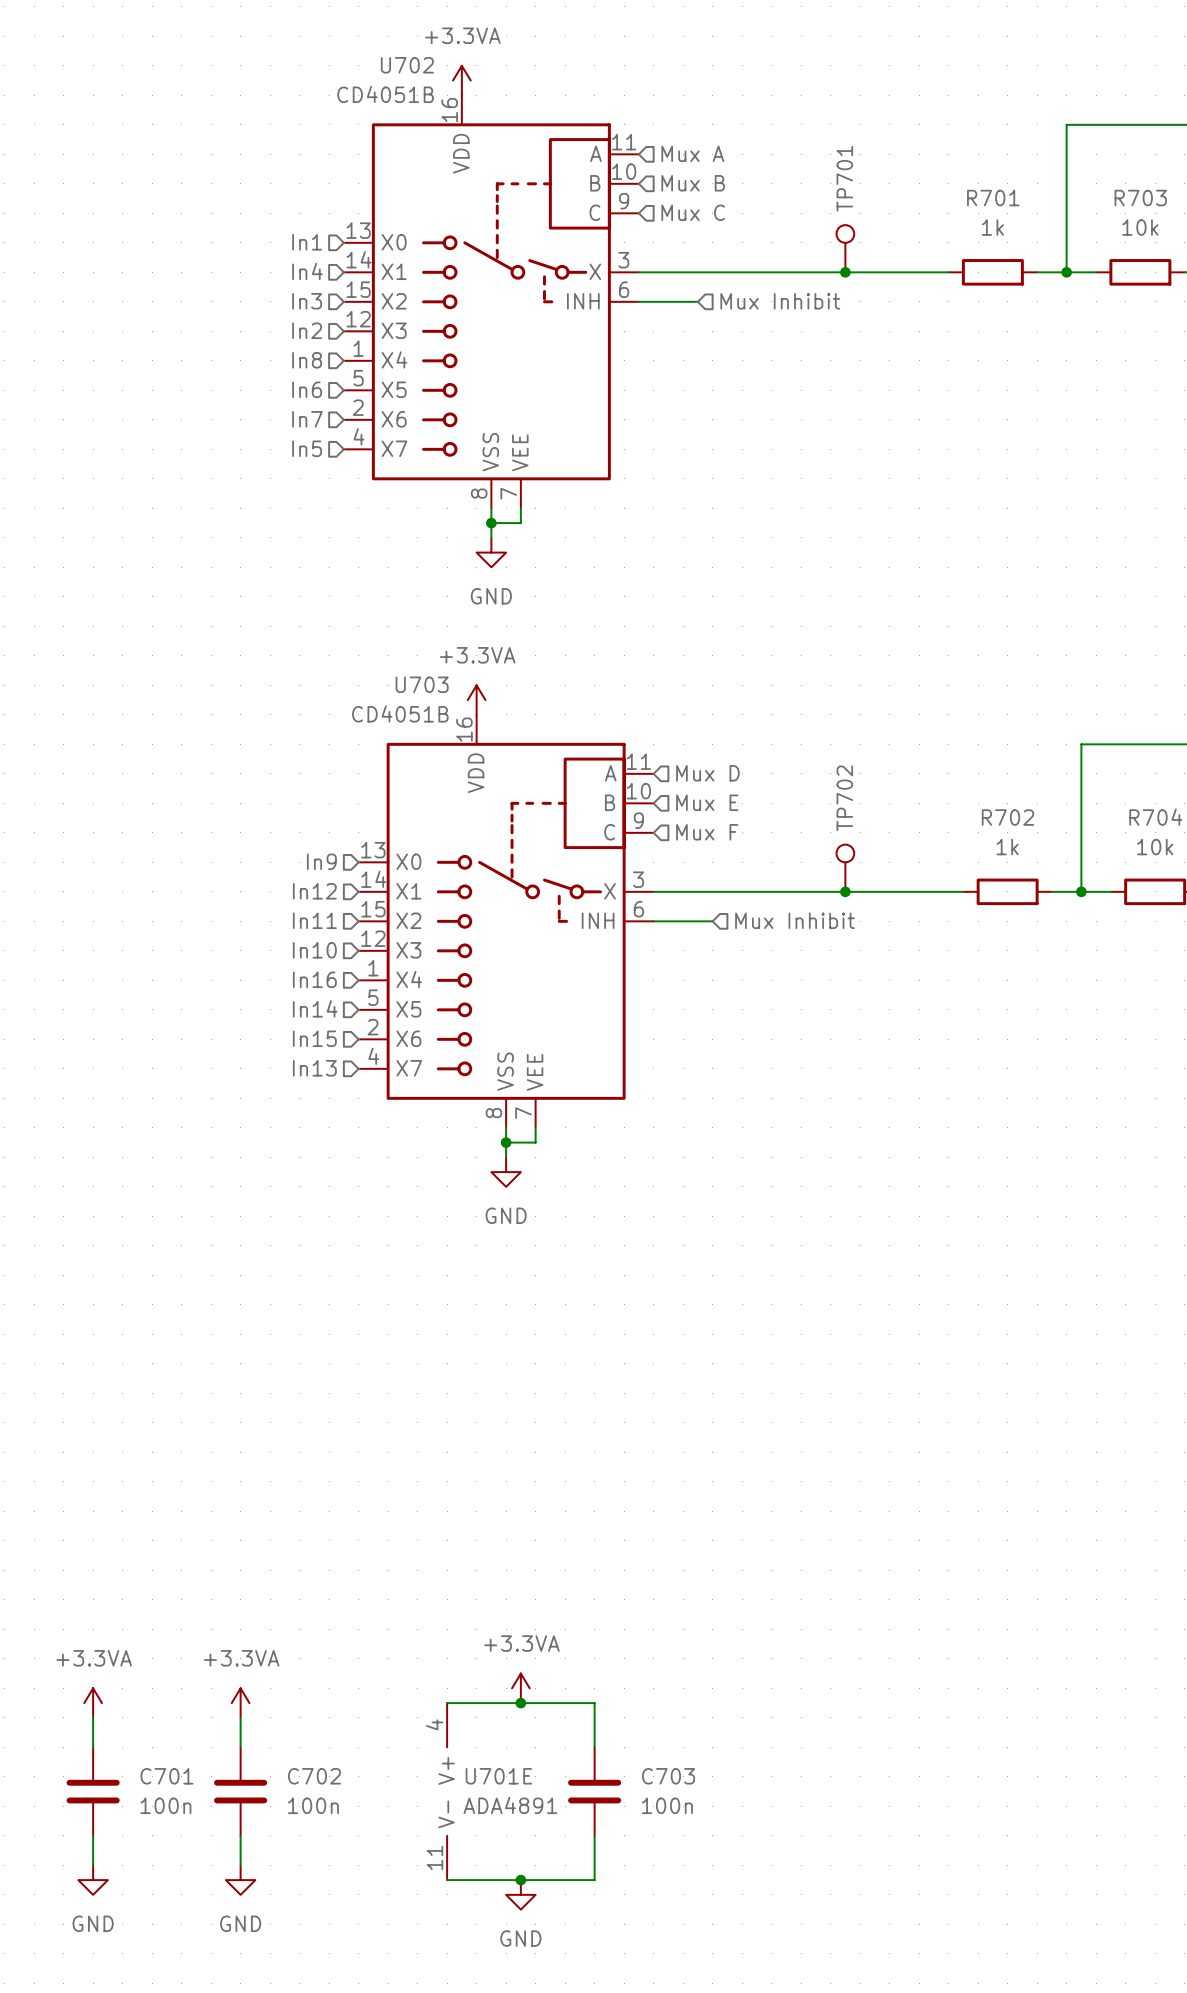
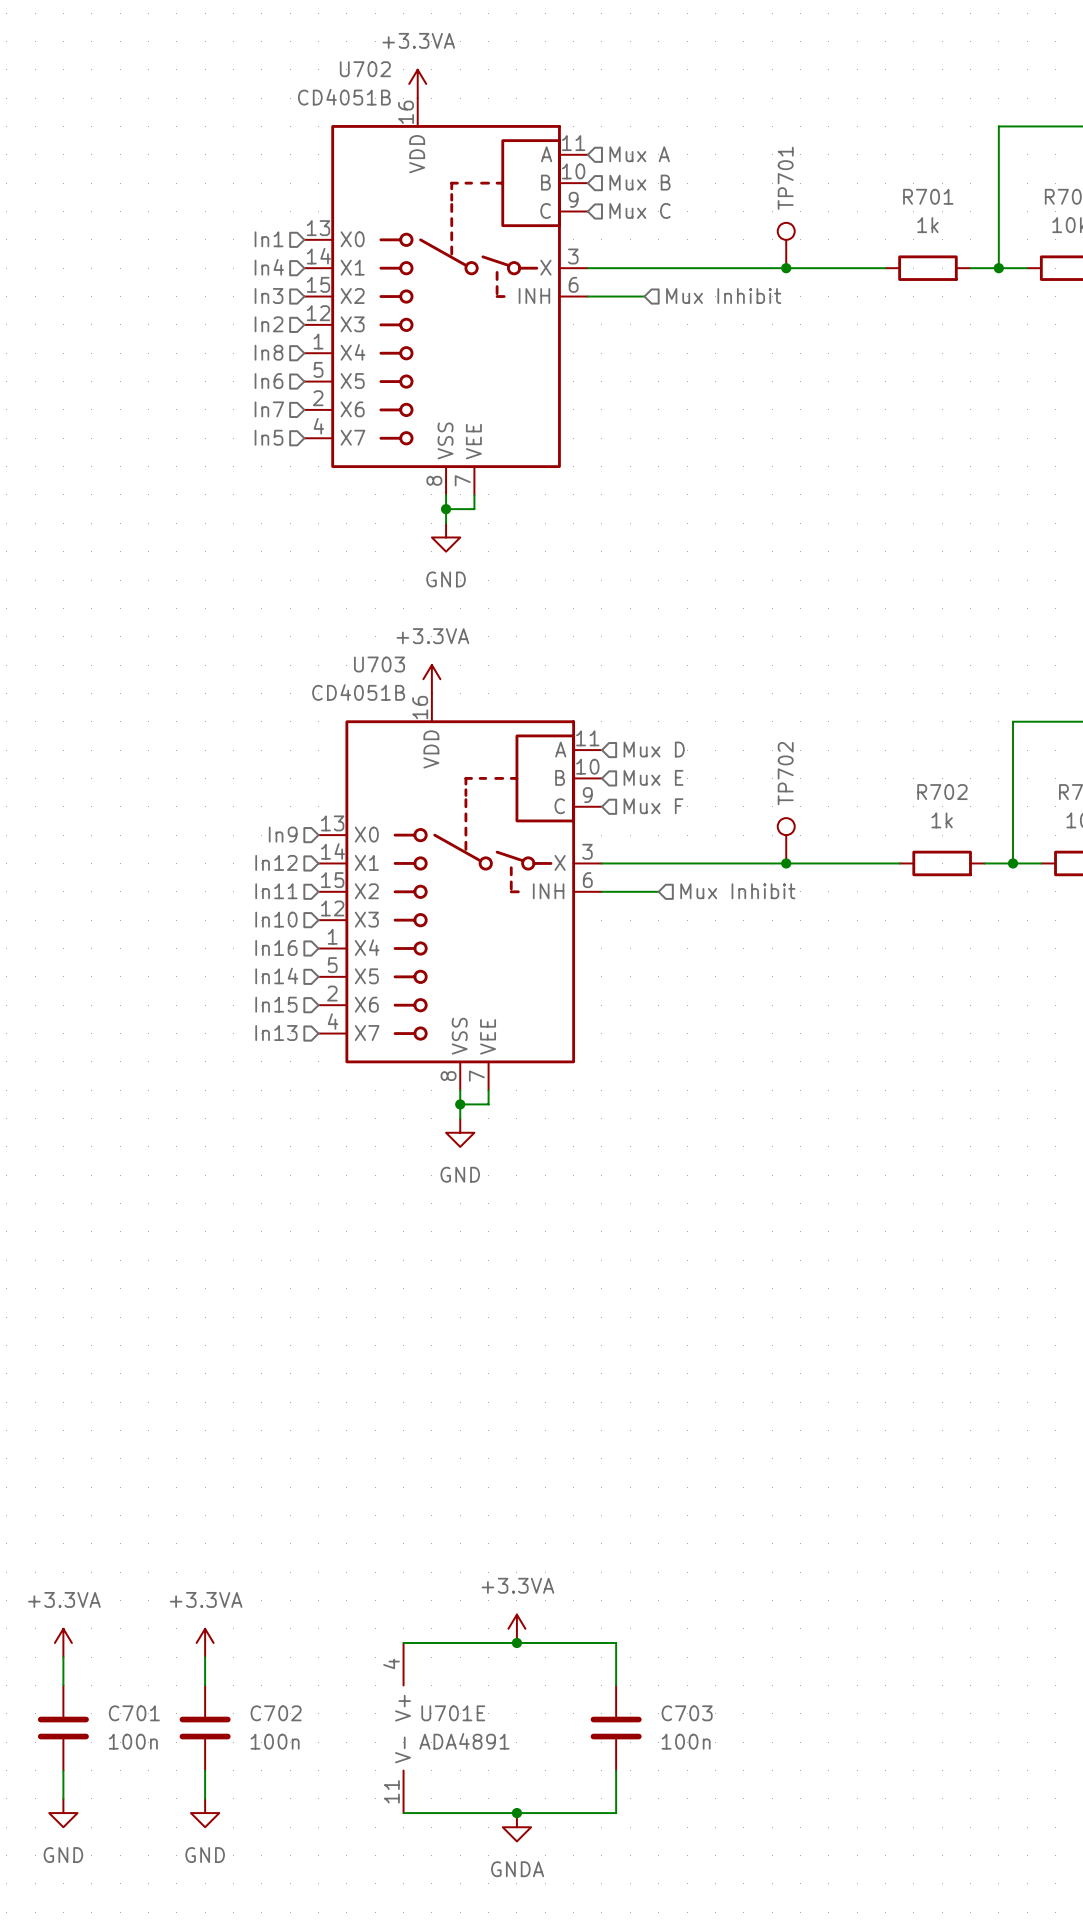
power symbol position: +3.3VA (520, 1688) -> +3.3VA (516, 1628)
junction position: (520, 1703) -> (516, 1642)
wire: (594, 1703) (594, 1747) -> (545, 1642) (616, 1642) (616, 1685)
C703 position: (594, 1791) -> (616, 1728)
wire: (594, 1835) (594, 1880) -> (616, 1770) (616, 1813) (545, 1813)
junction position: (520, 1880) -> (516, 1813)
power symbol: GND (520, 1894) -> none
power symbol: none -> GNDA (516, 1827)

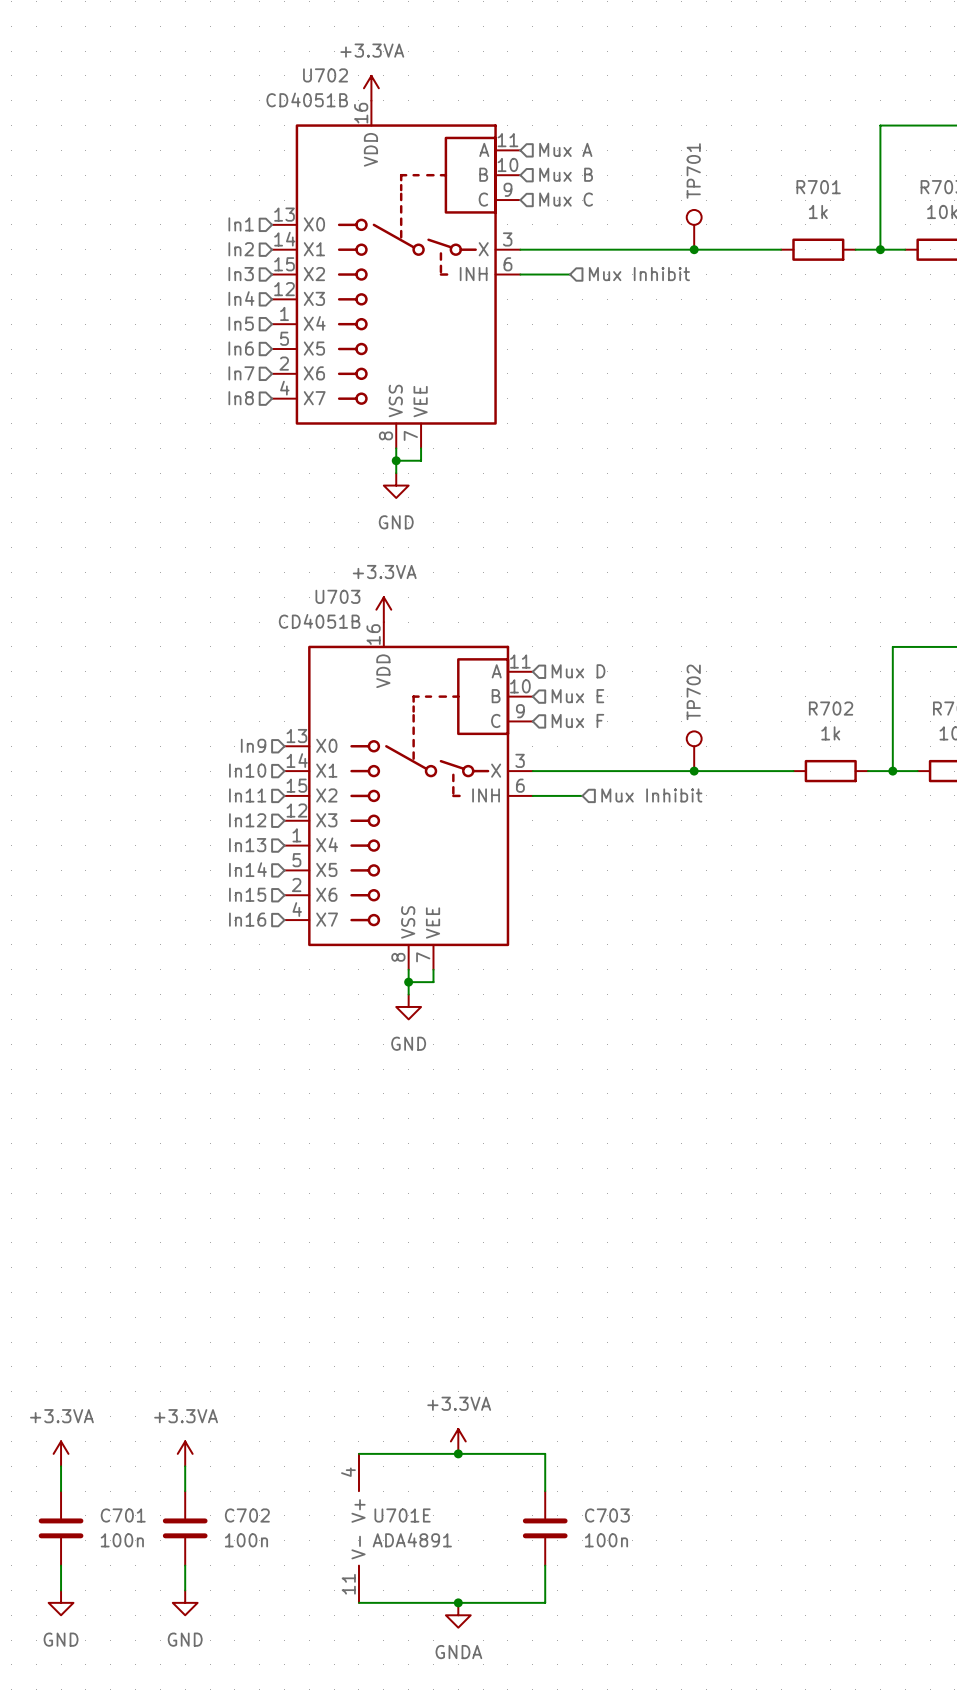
hierarchical label: In4 (269, 267) -> In2 (241, 249)
hierarchical label: In2 (269, 324) -> In4 (241, 298)
hierarchical label: In8 (269, 352) -> In5 (241, 323)
hierarchical label: In5 (269, 437) -> In8 (241, 398)
hierarchical label: In12 (276, 862) -> In10 (247, 770)
hierarchical label: In10 (276, 919) -> In12 (247, 820)
hierarchical label: In16 (276, 947) -> In13 (247, 845)
hierarchical label: In13 (276, 1033) -> In16 (247, 919)

